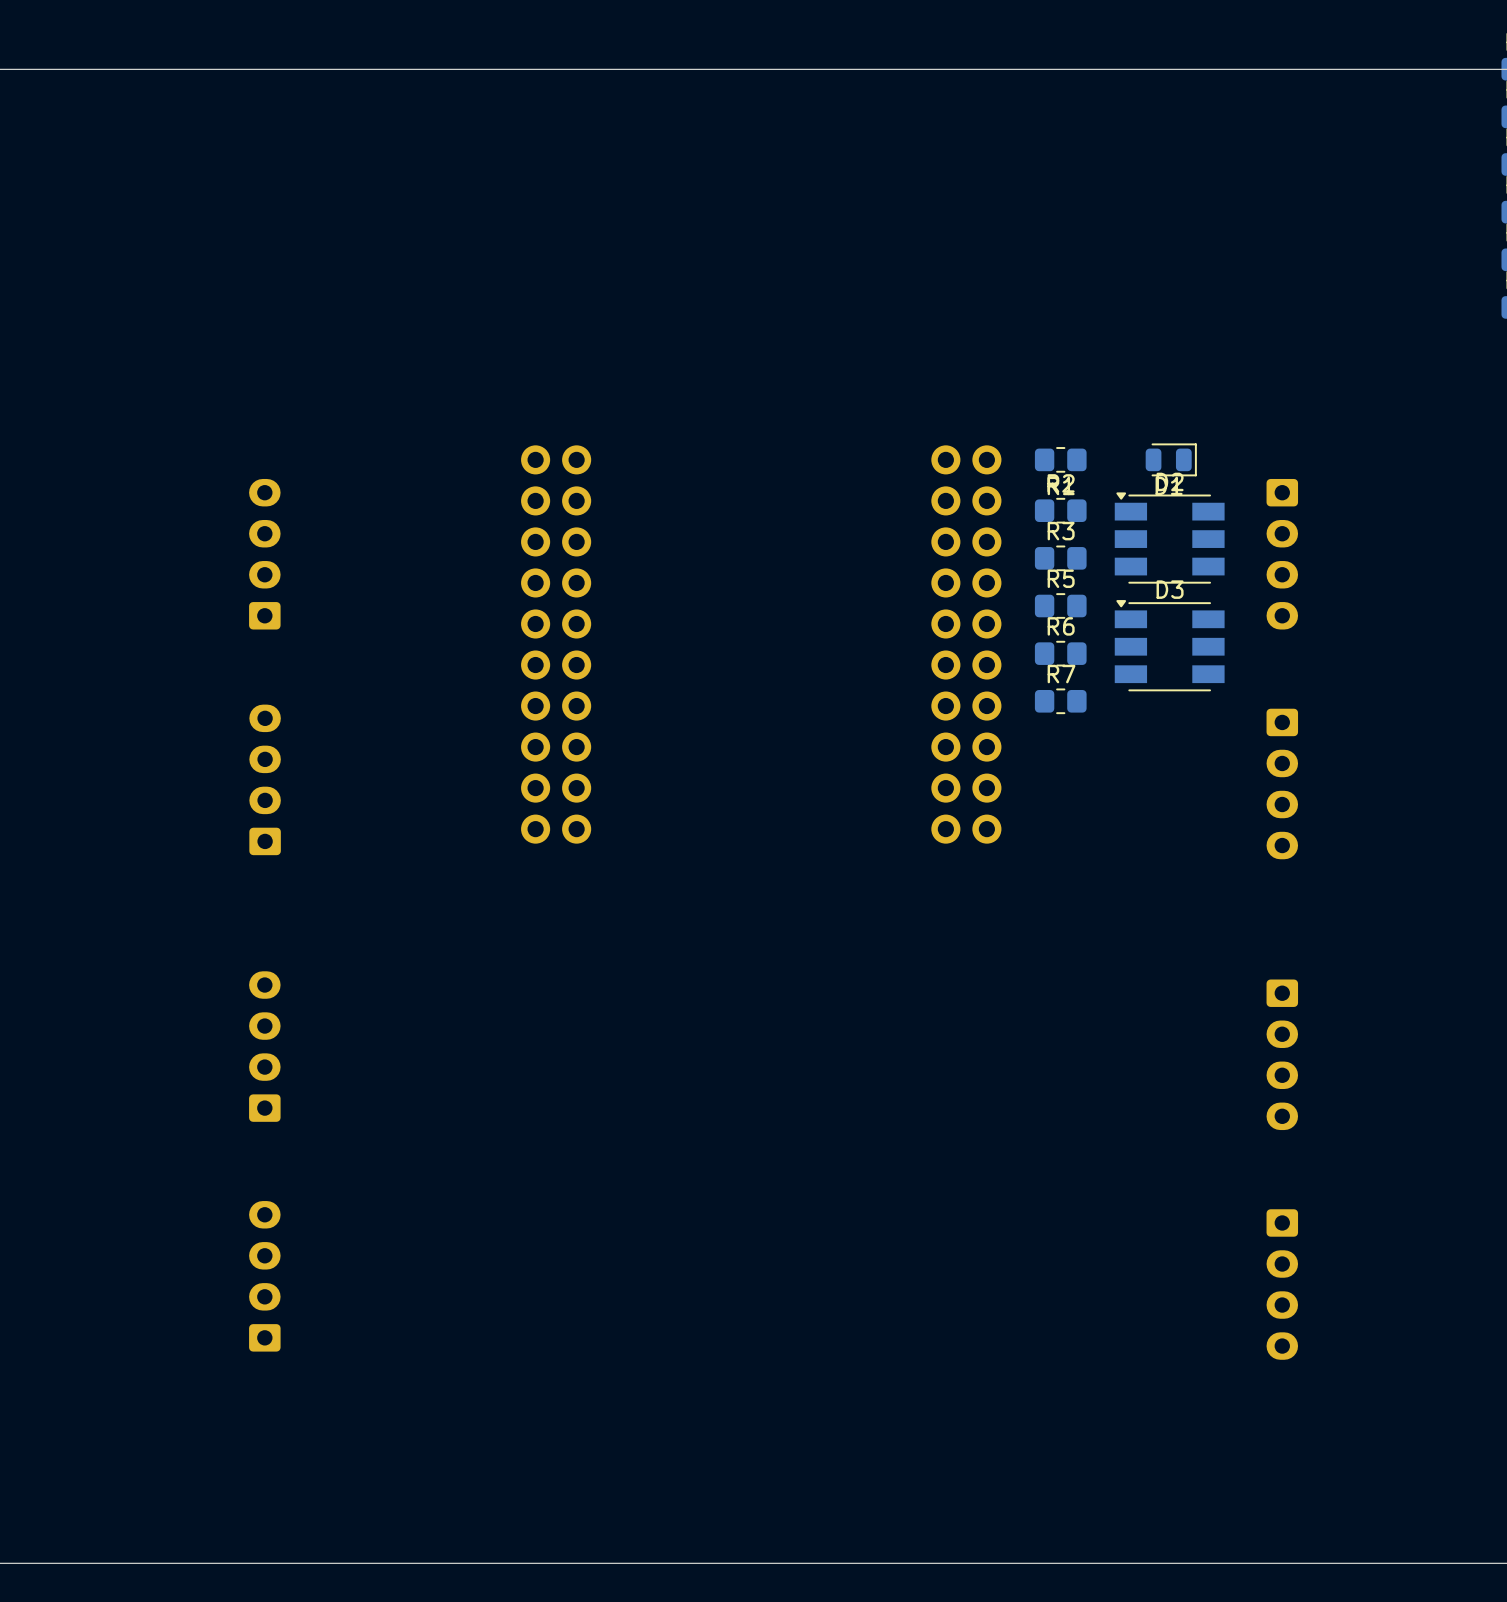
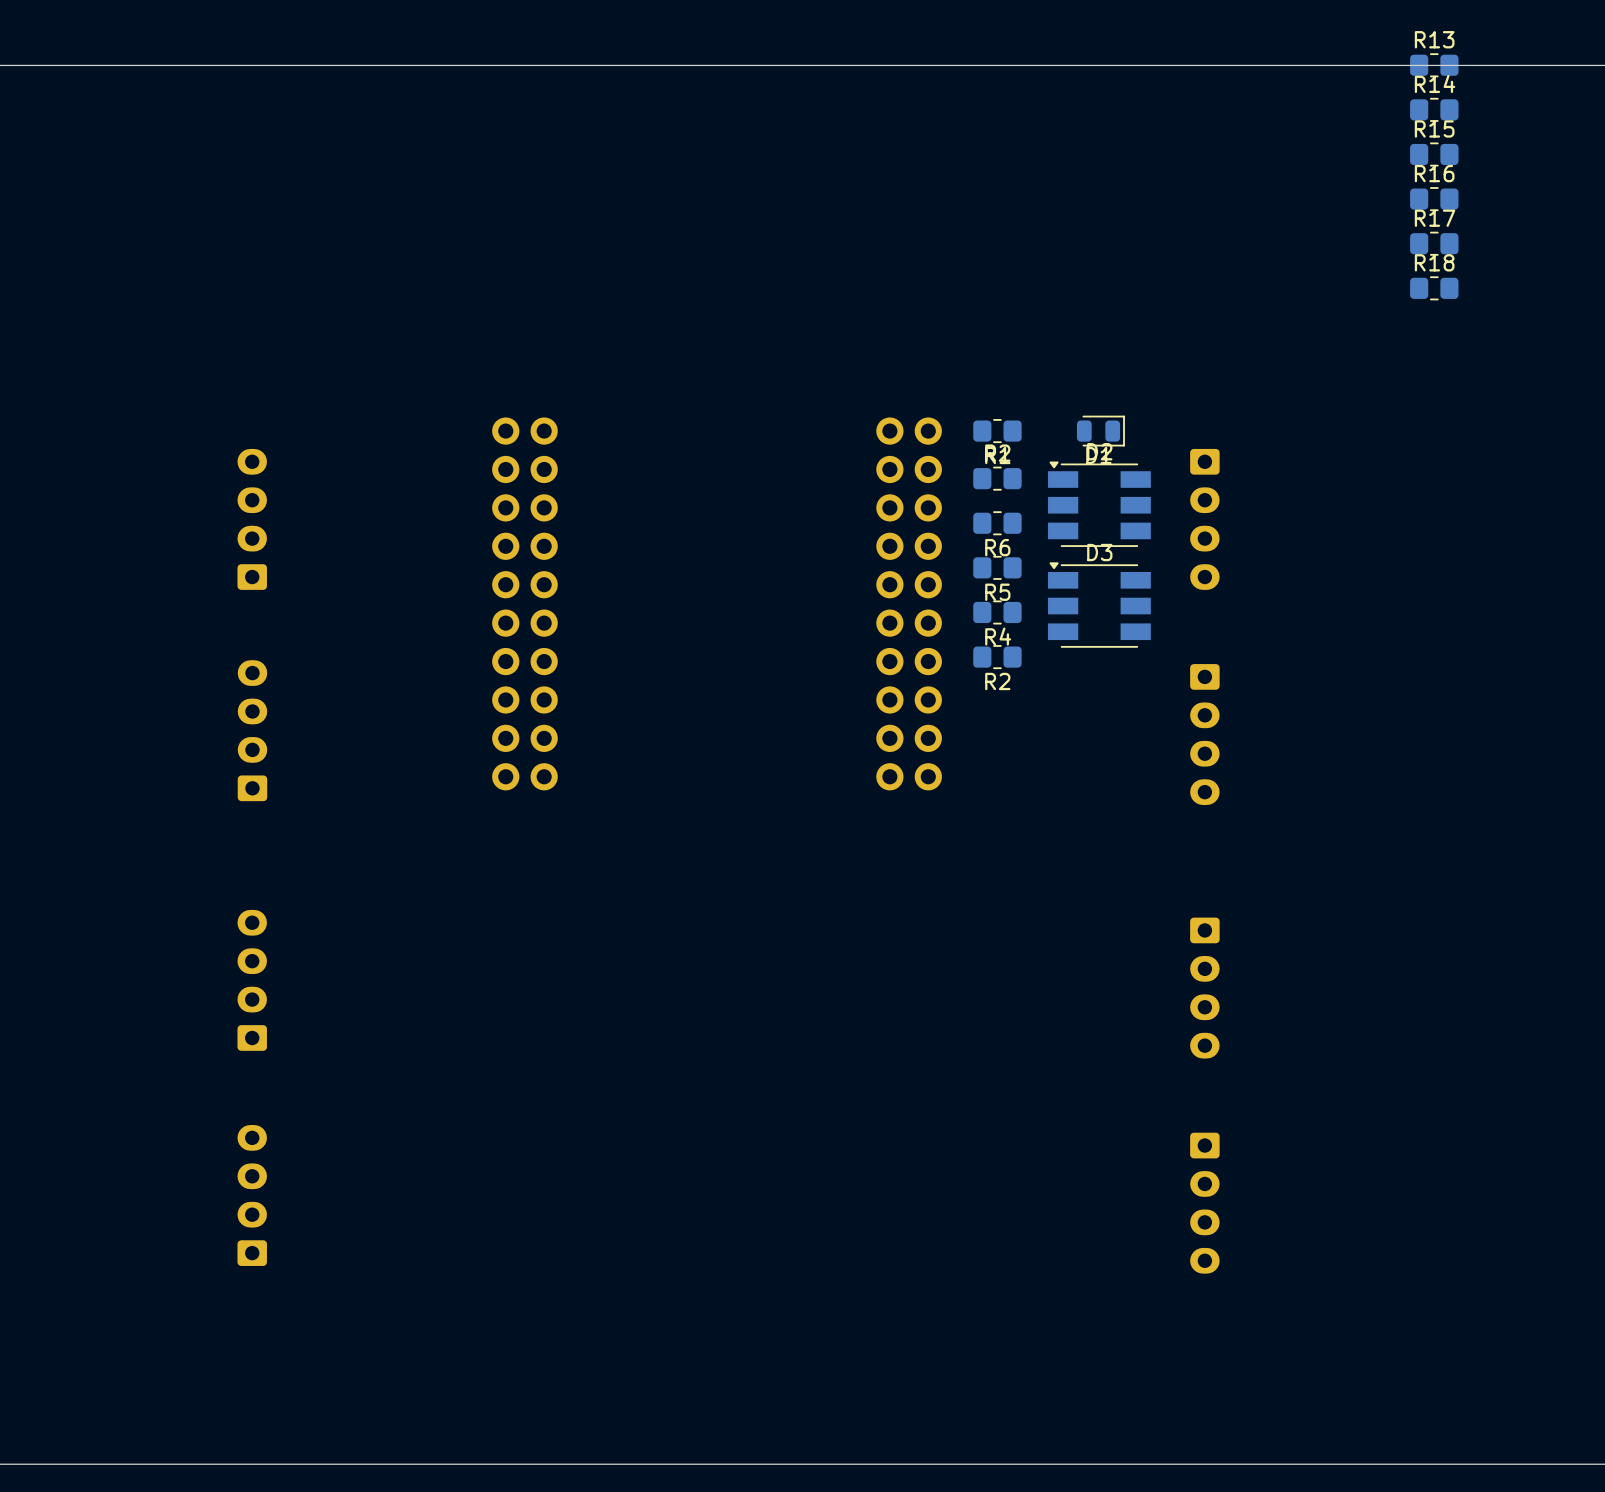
R3 name: R3 (1061, 531) -> R6 (997, 547)
R5 name position: R5 (1061, 578) -> R5 (997, 592)
R6 name: R6 (1061, 626) -> R4 (998, 636)
R7 name: R7 (1061, 674) -> R2 (997, 681)

